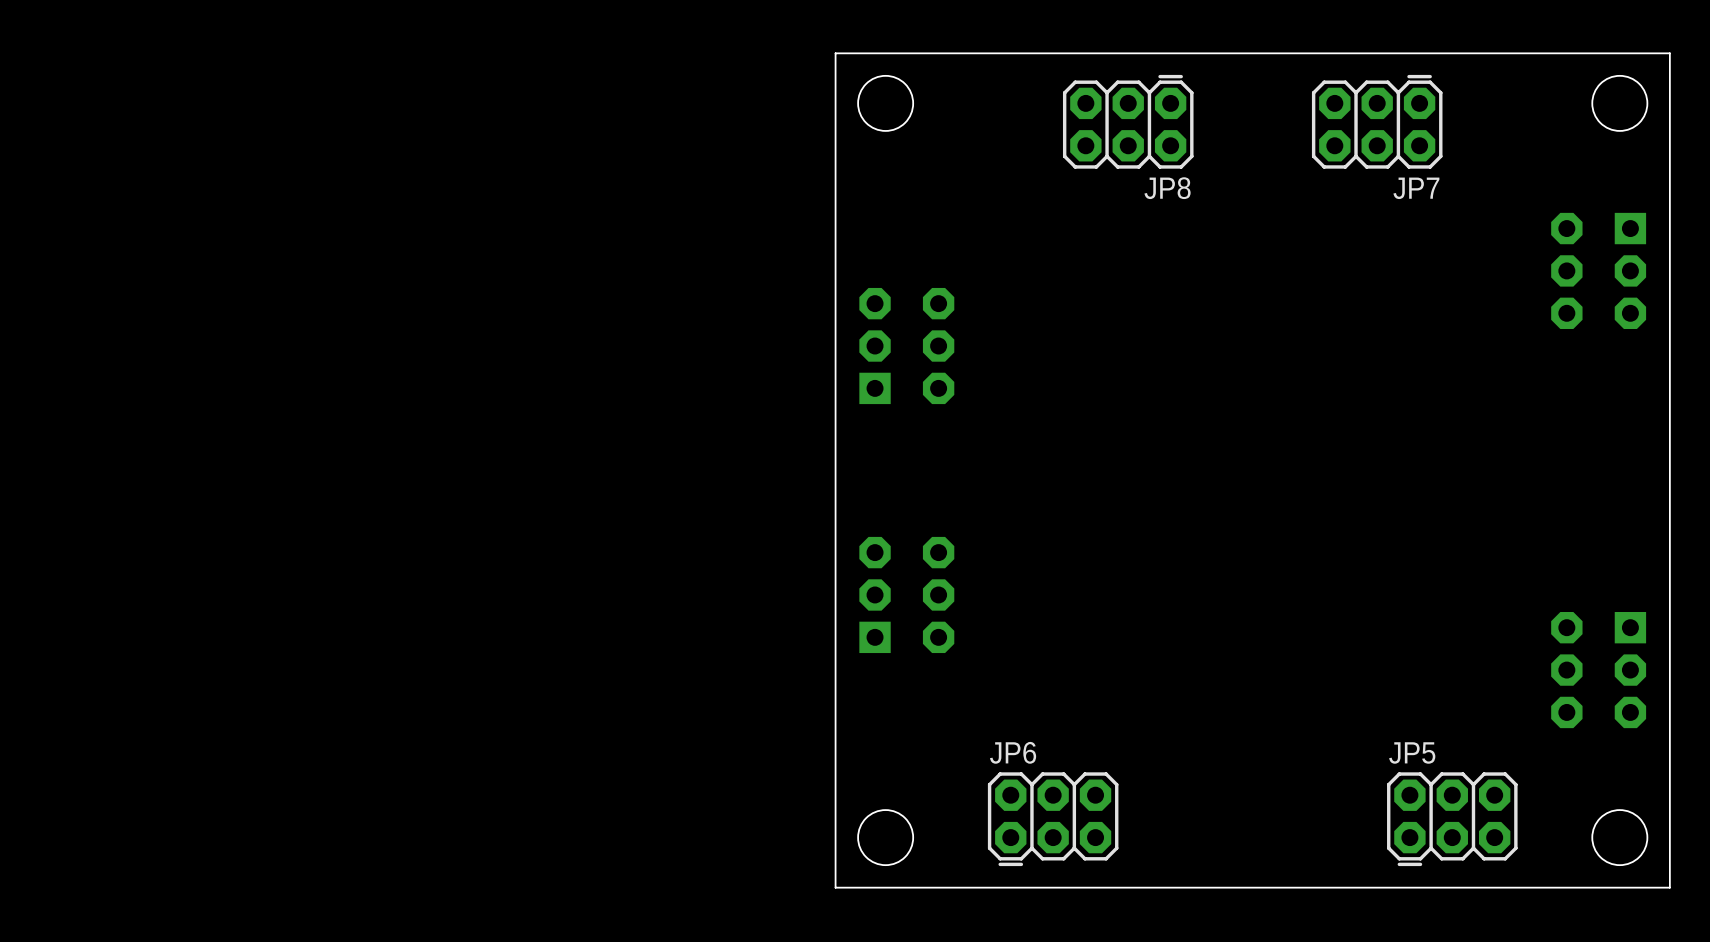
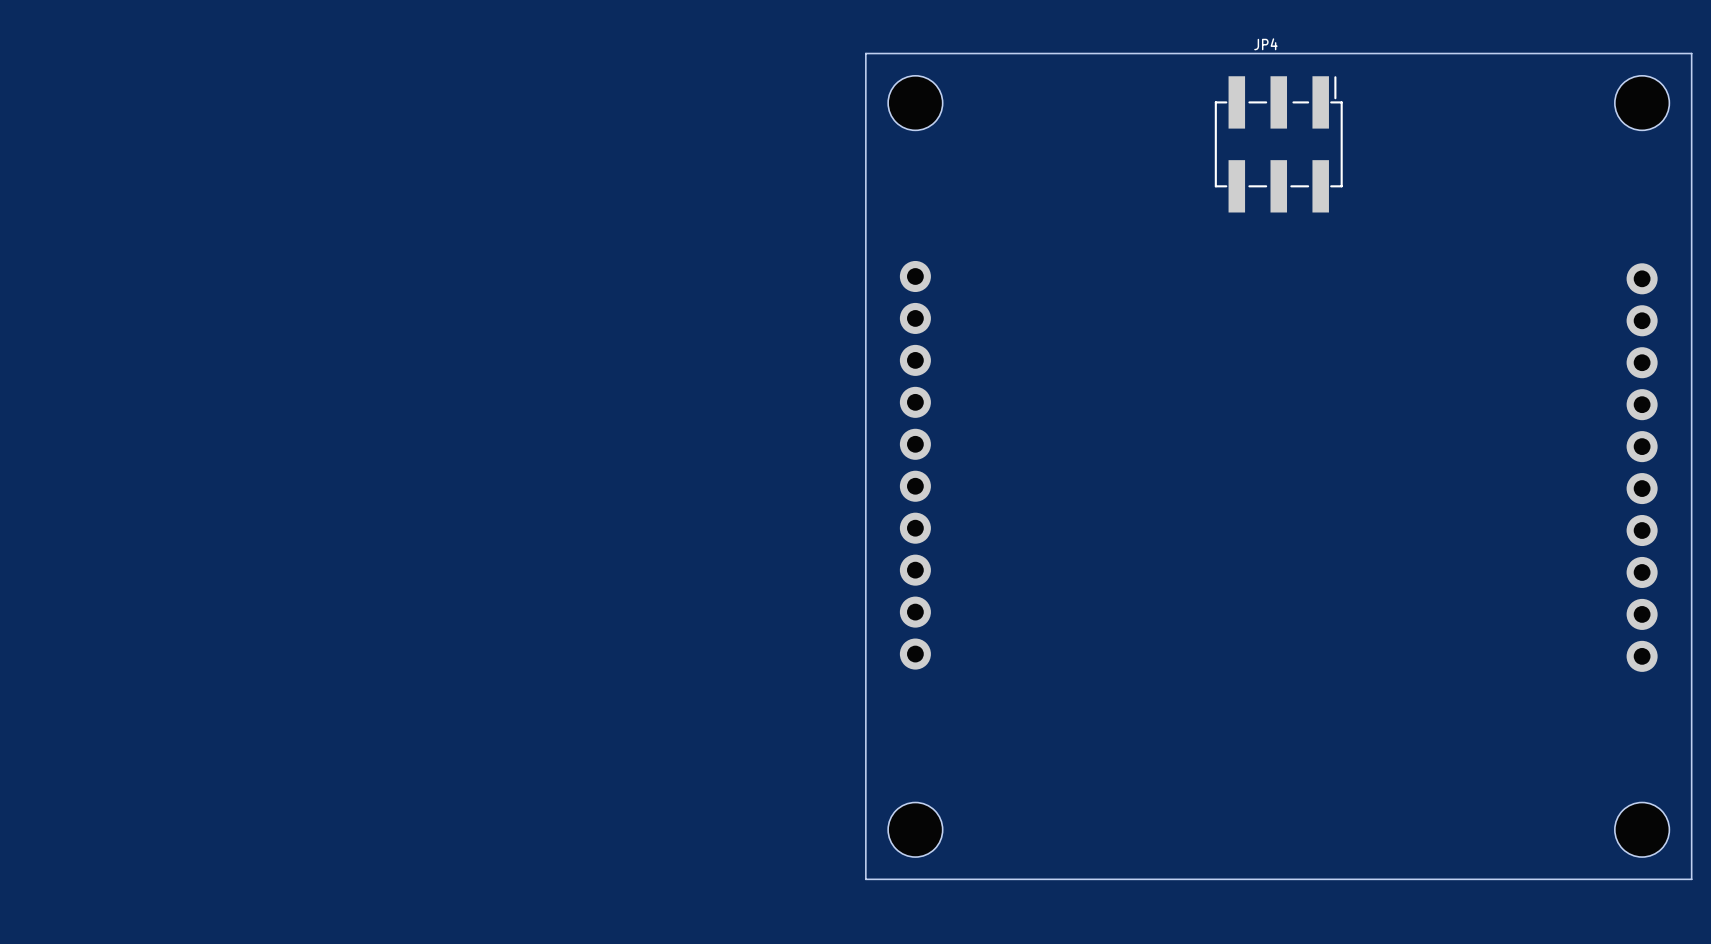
JP8: (1128, 121) -> none
JP7: (1377, 121) -> none
JP4: none -> (1278, 144)
part: (1598, 270) -> none
part: (906, 346) -> none
part: none -> (915, 465)
part: none -> (1642, 467)
part: (906, 594) -> none
part: (1598, 670) -> none
JP6: (1053, 819) -> none
JP5: (1452, 819) -> none

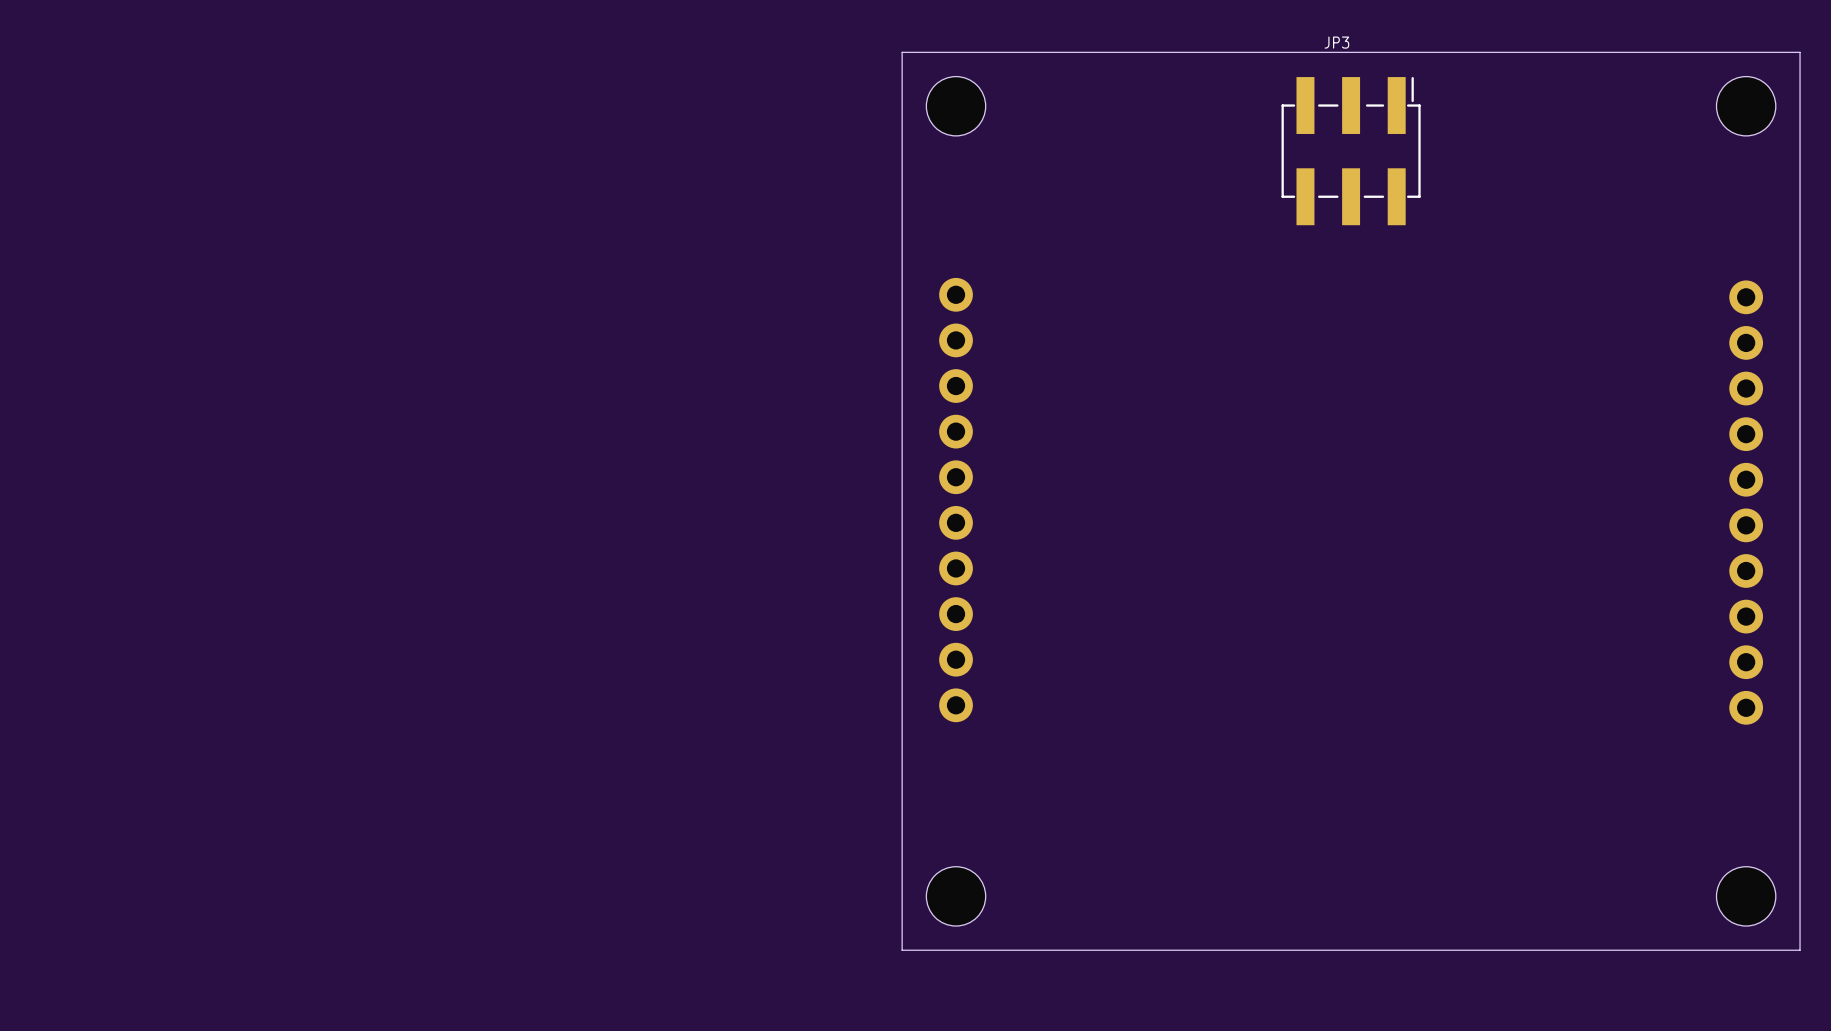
JP4 name: JP4 (1265, 44) -> JP3 (1336, 42)

